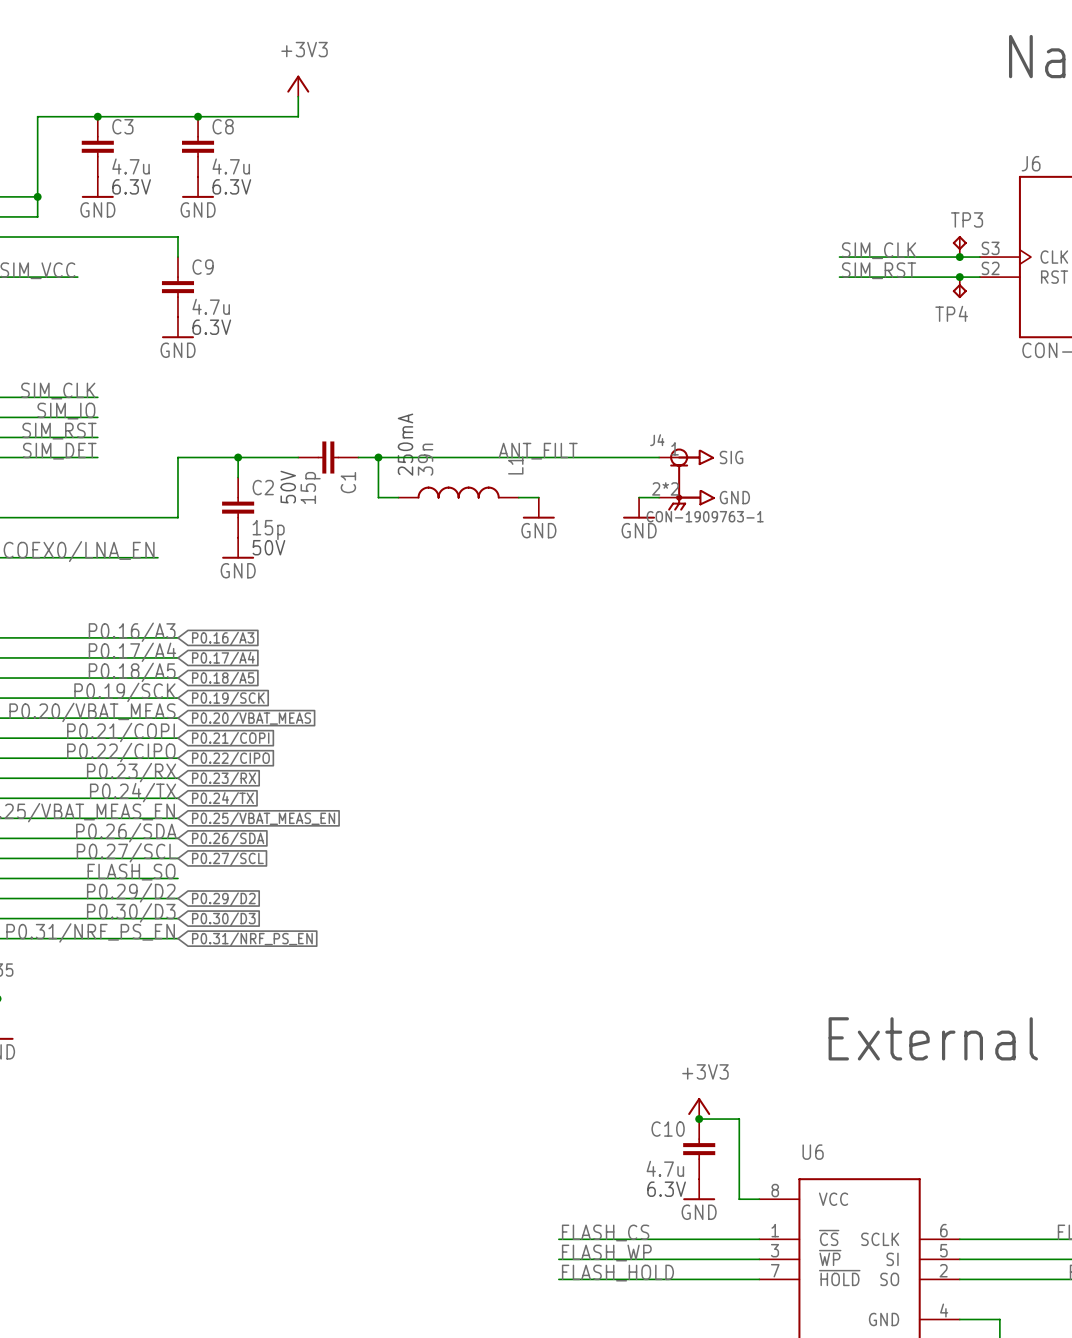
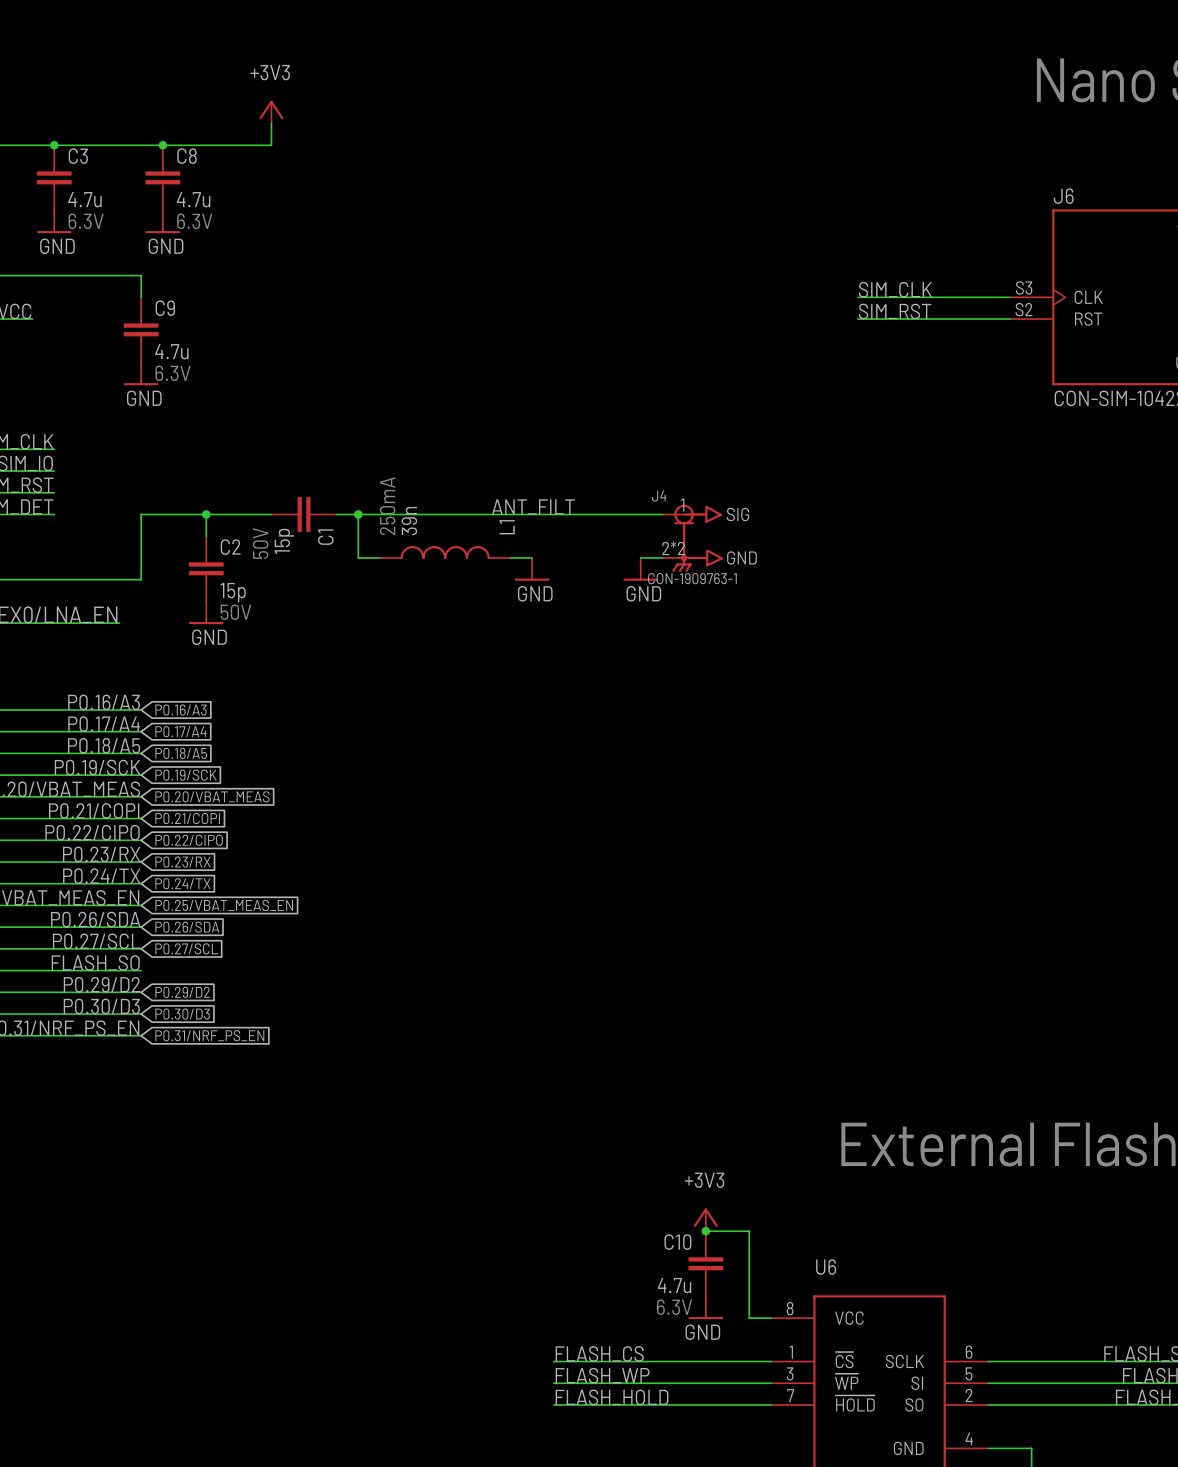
TP3: (959, 246) -> none
junction: (959, 257) -> none
junction: (959, 277) -> none
TP4: (959, 287) -> none

